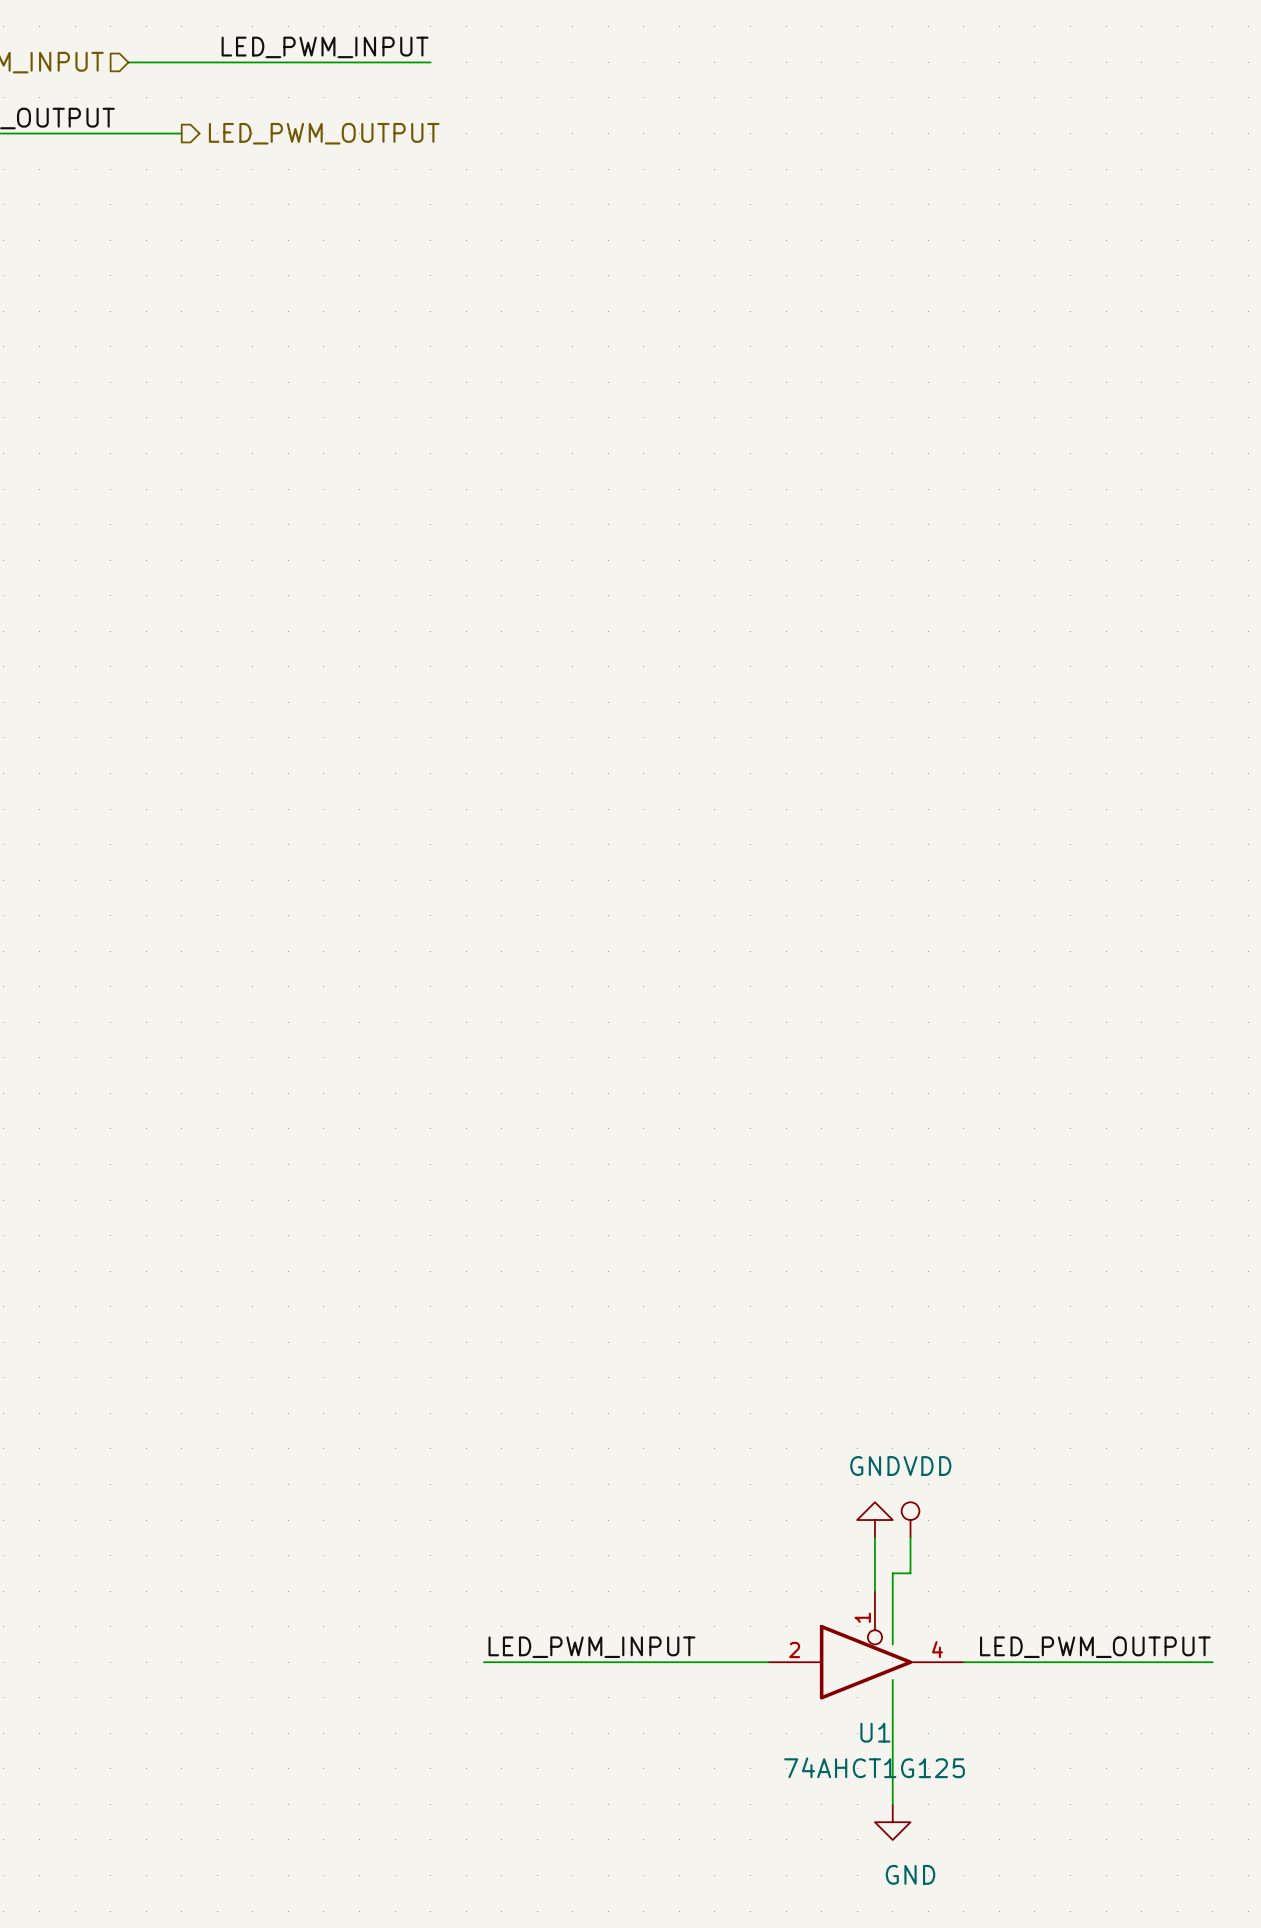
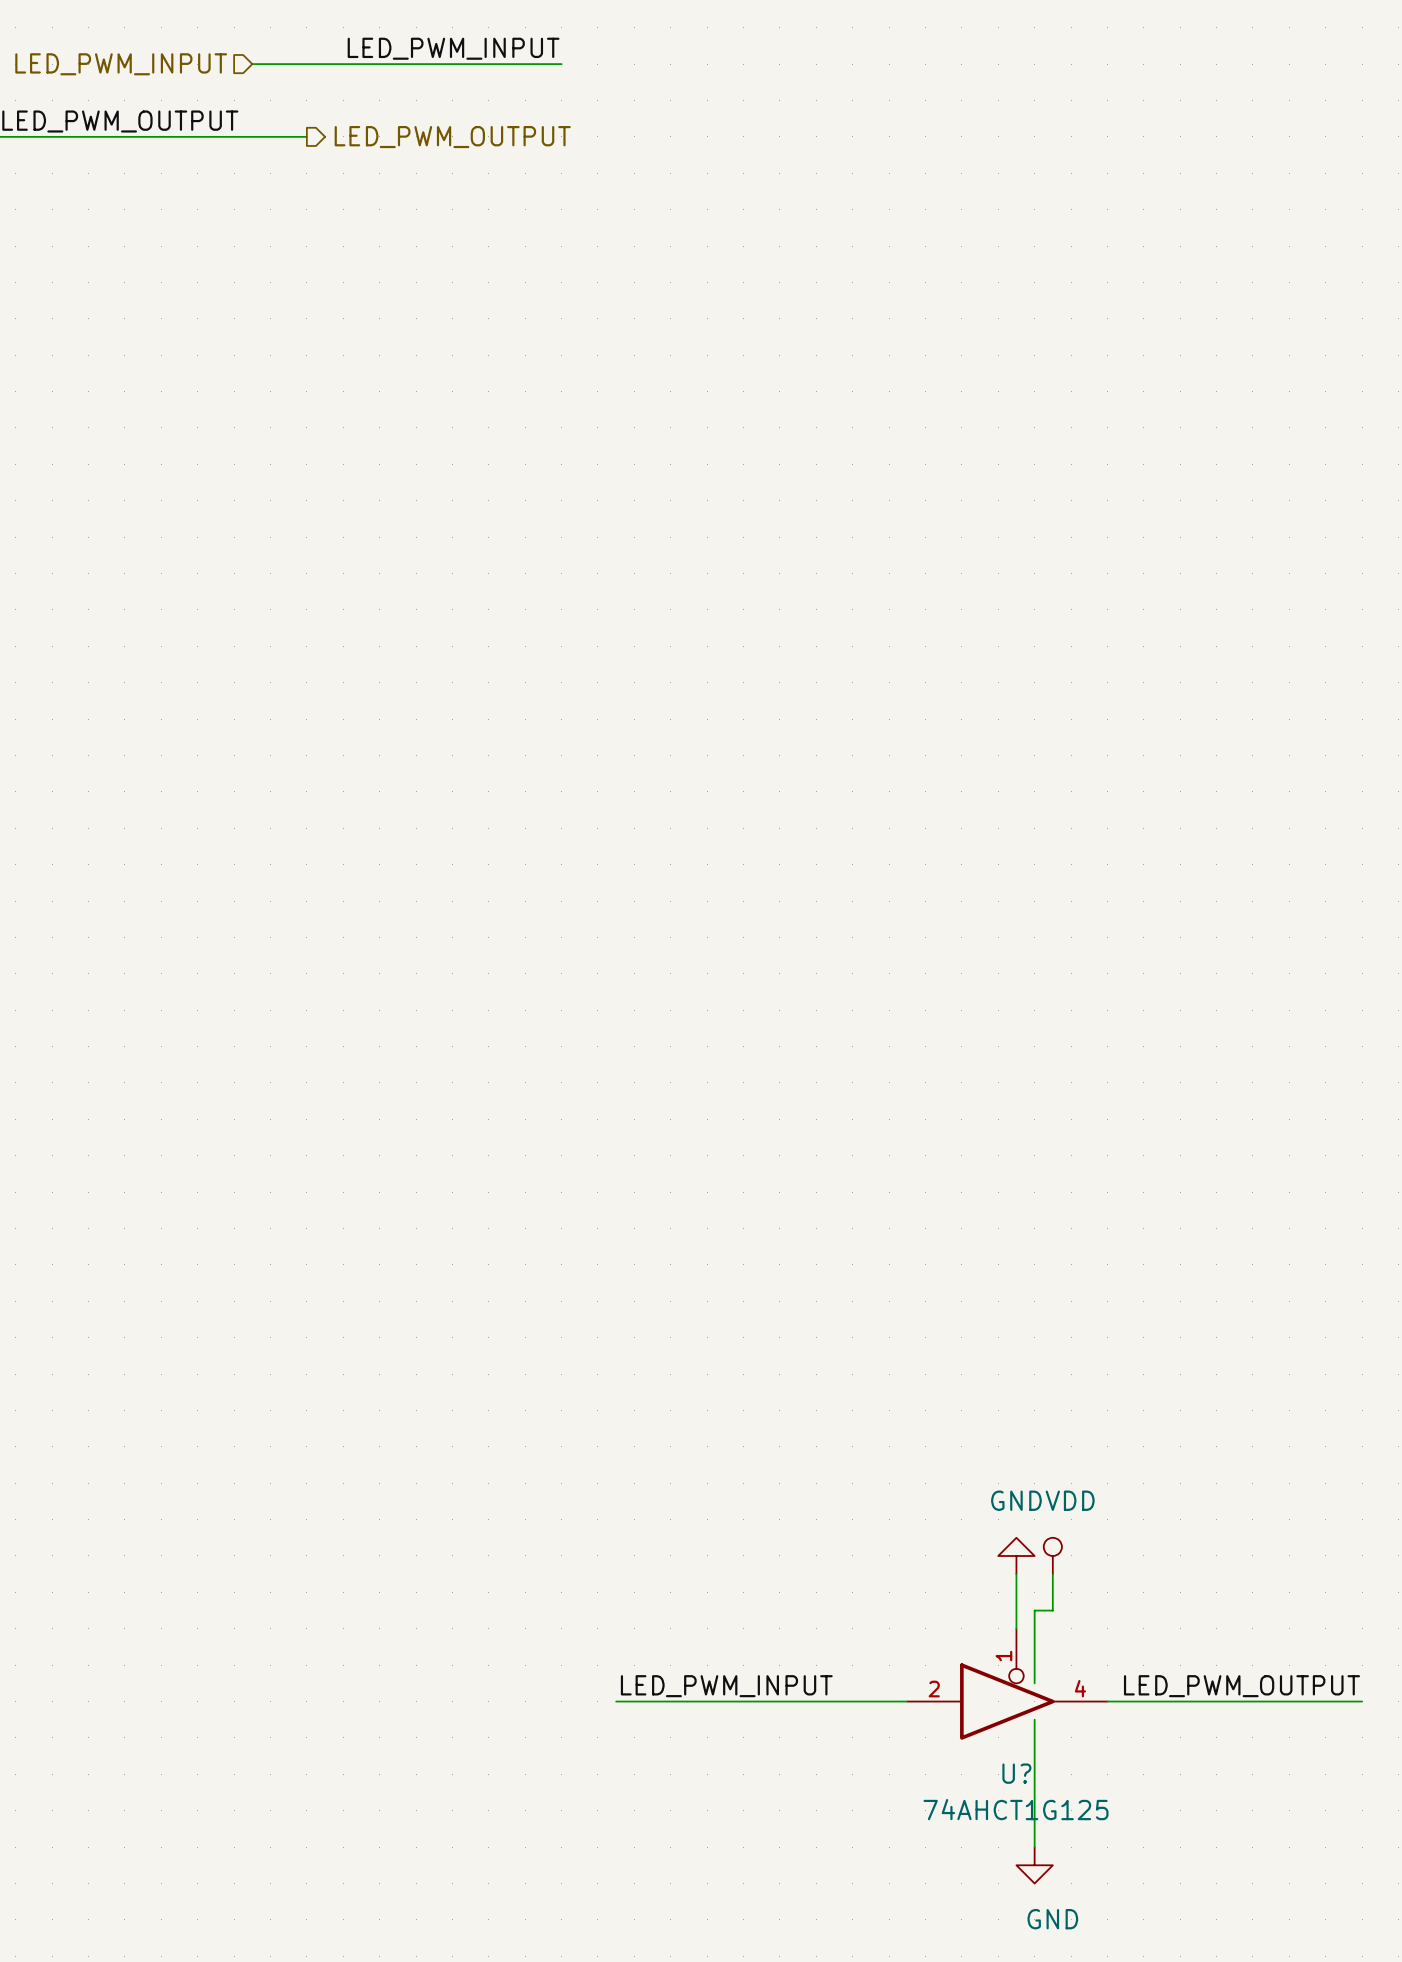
U1 name: U1 (875, 1732) -> U? (1016, 1773)

